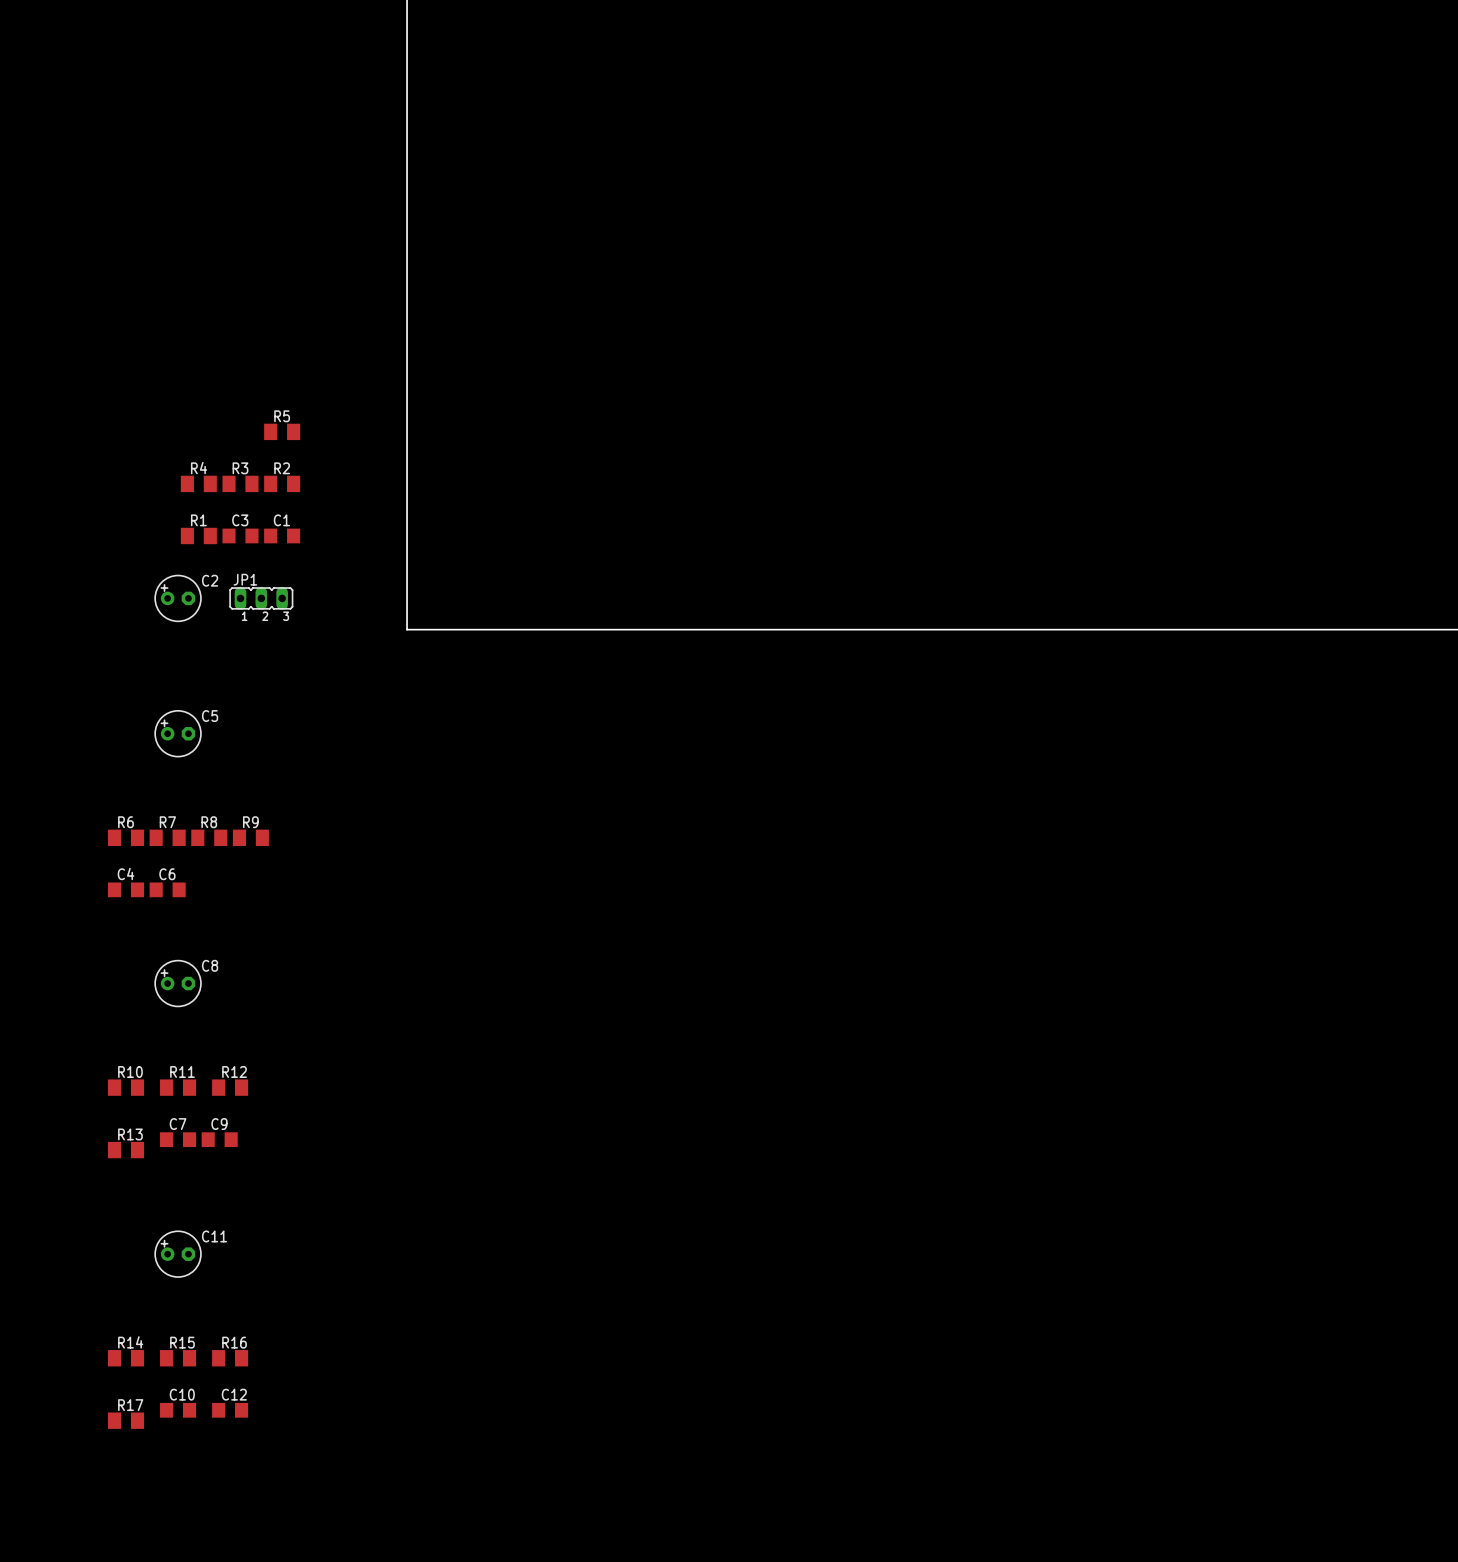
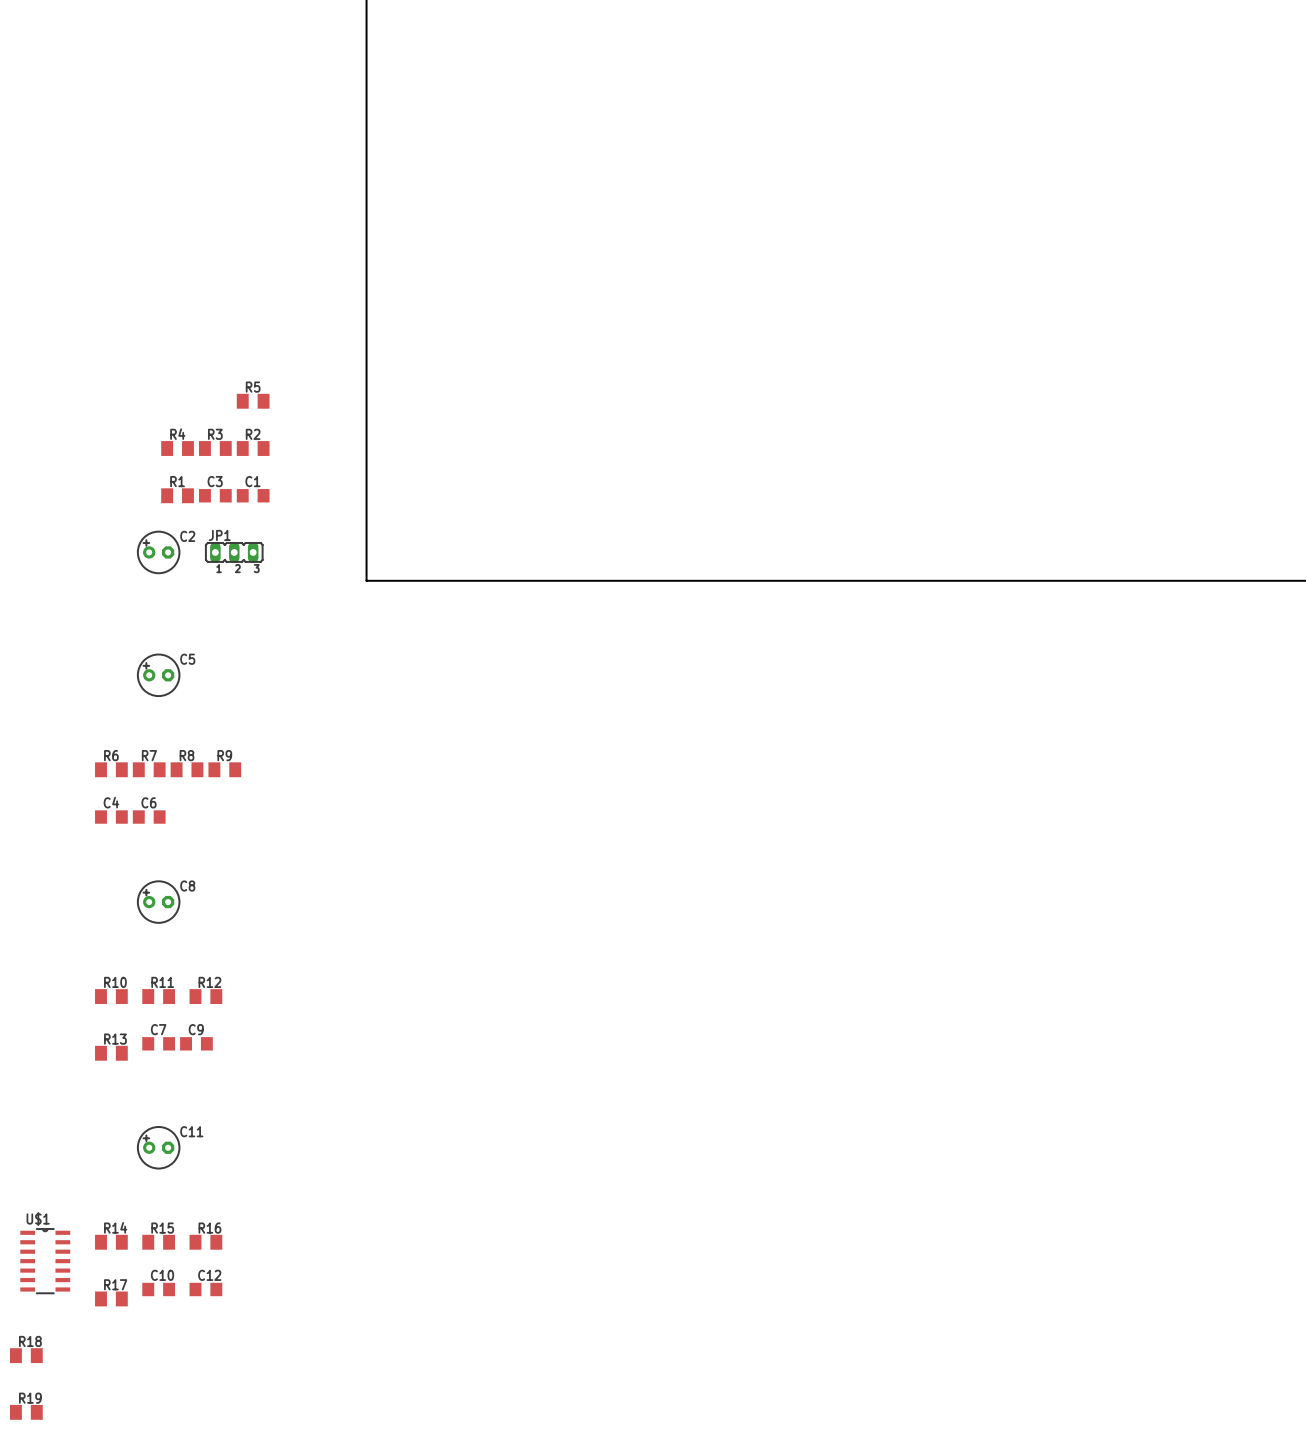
U$1: none -> (45, 1261)
R18: none -> (26, 1355)
R19: none -> (26, 1412)

